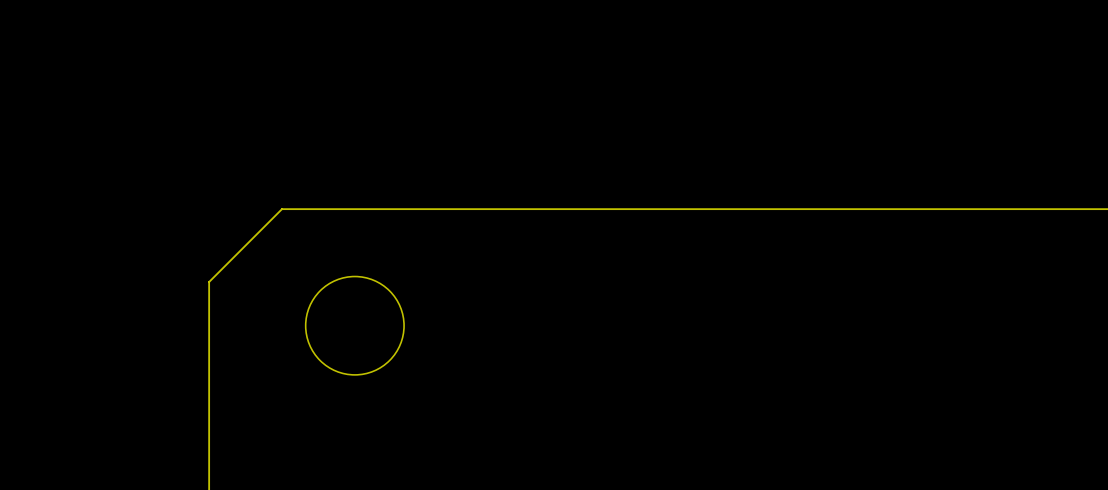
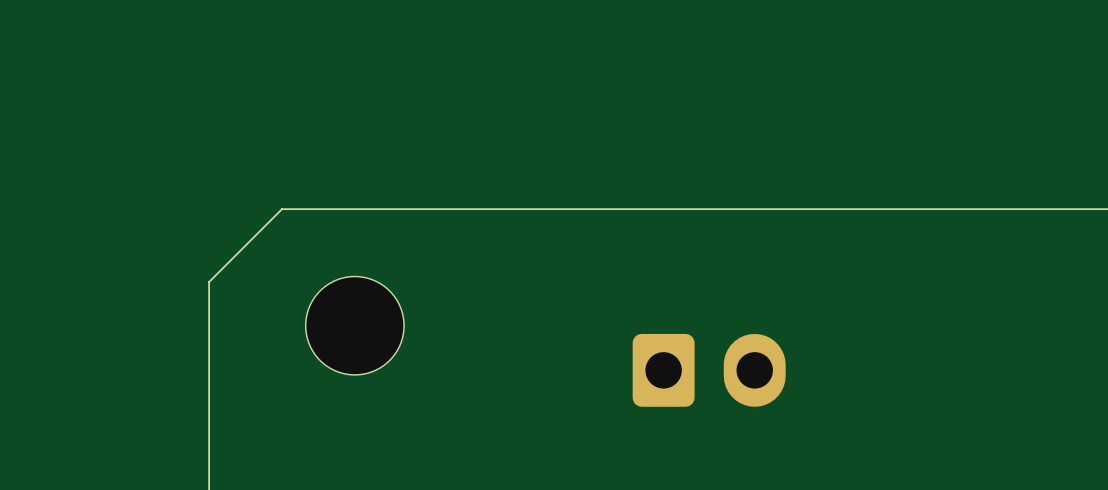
part: none -> (709, 370)

